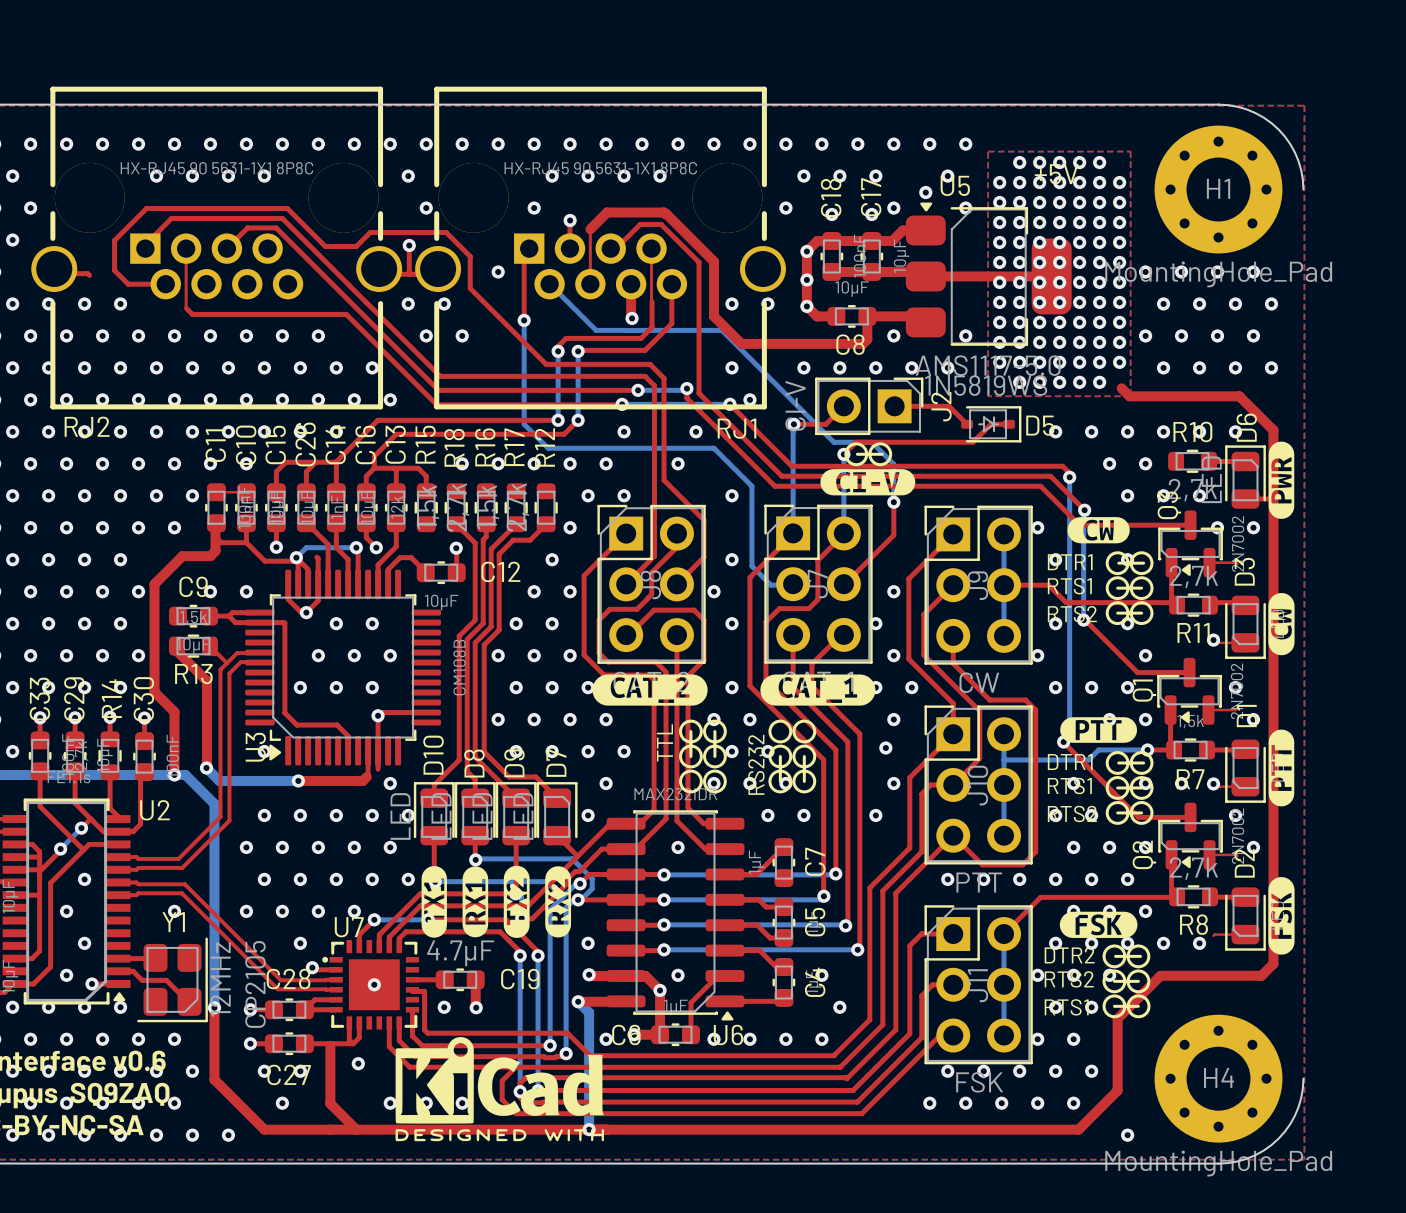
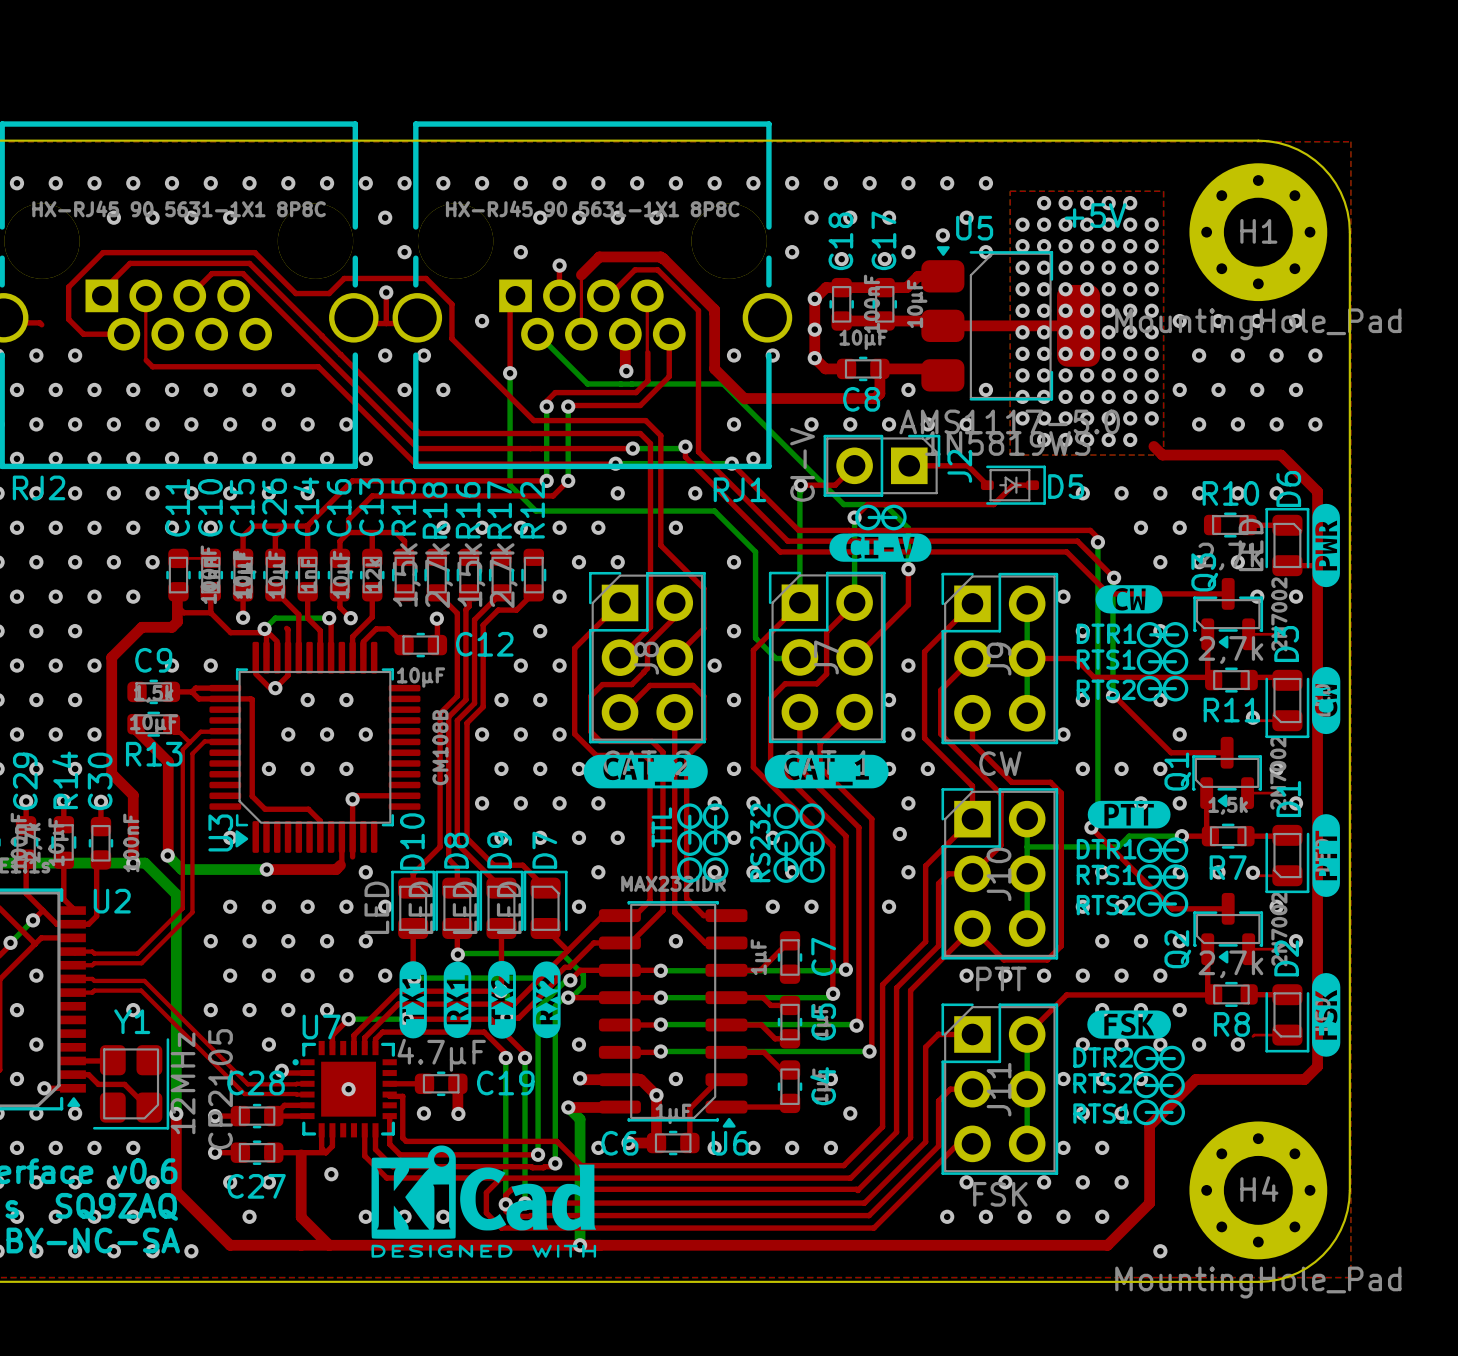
board edge: none -> (1349, 232) (1349, 1190)

